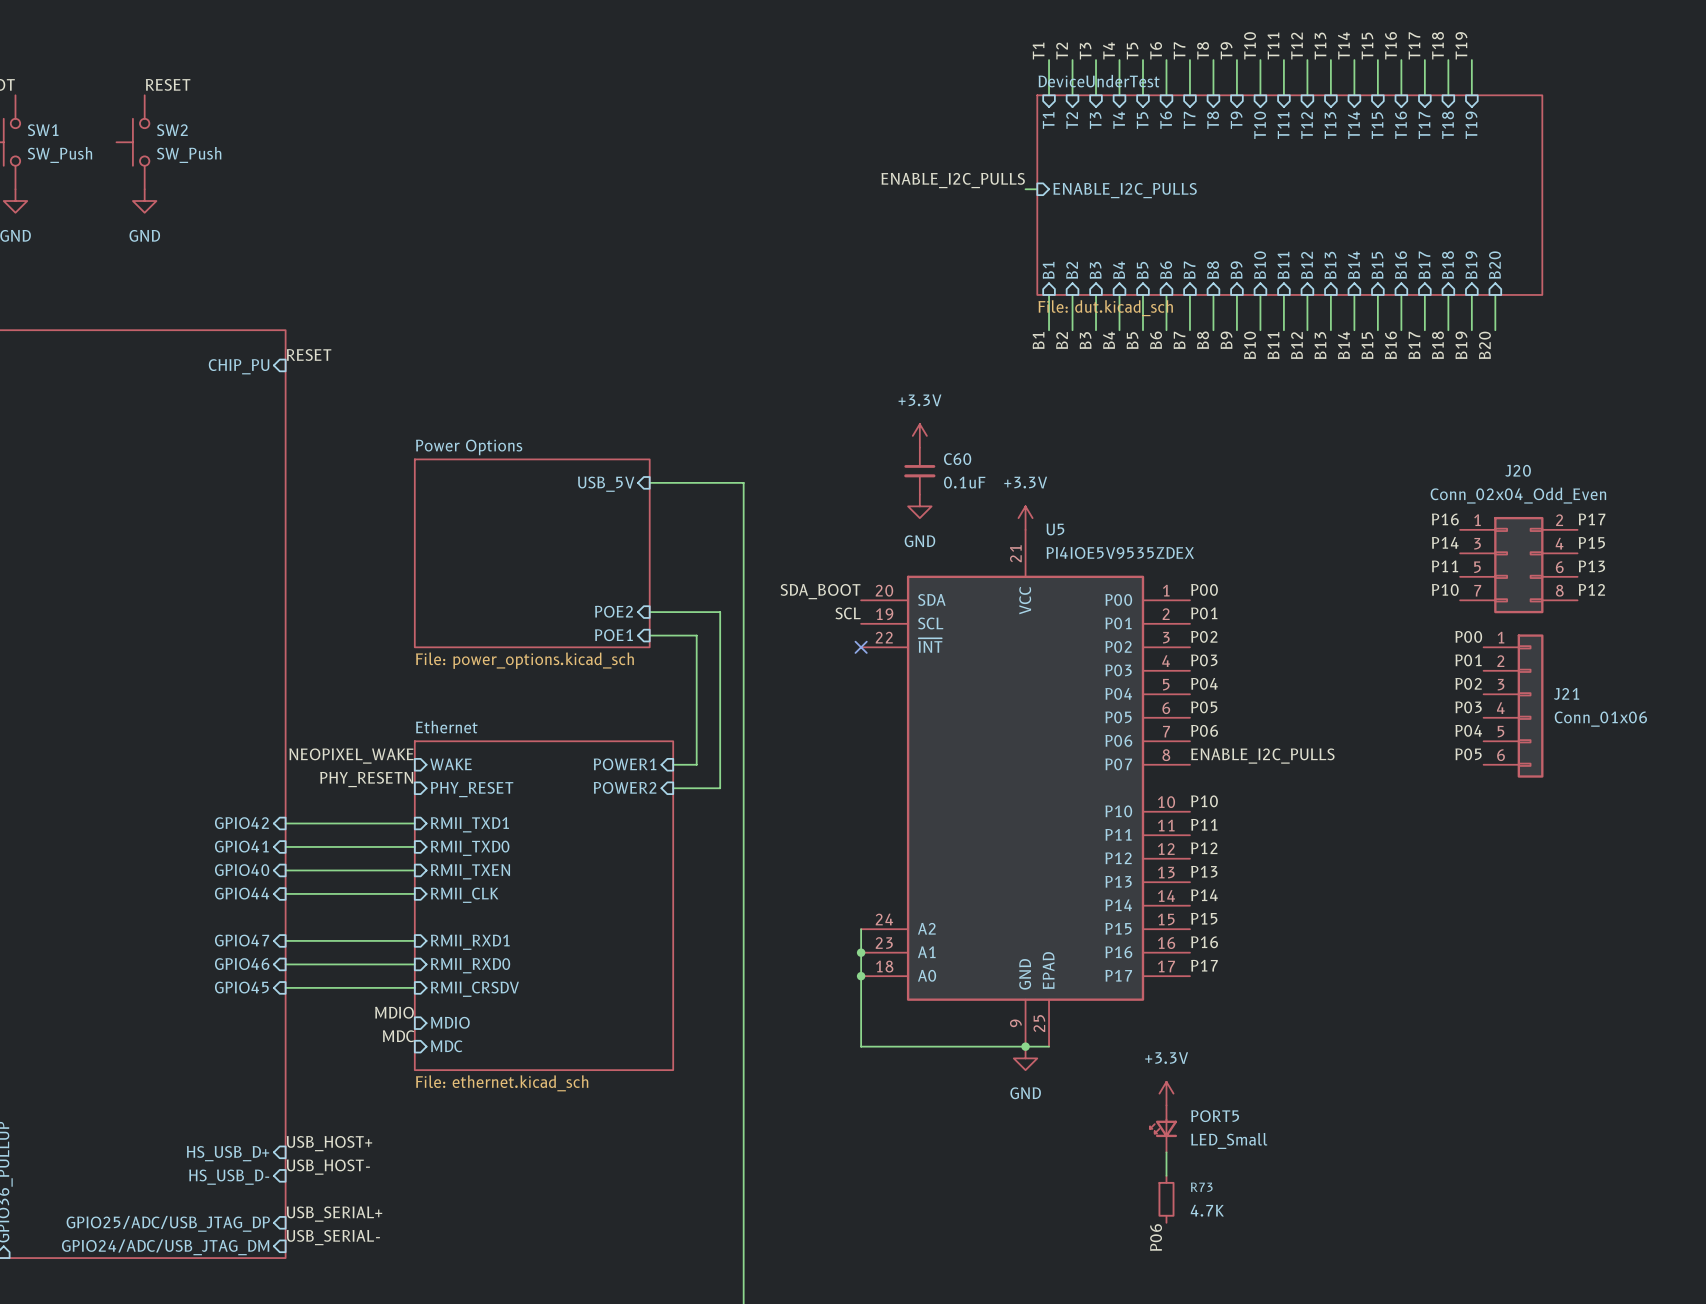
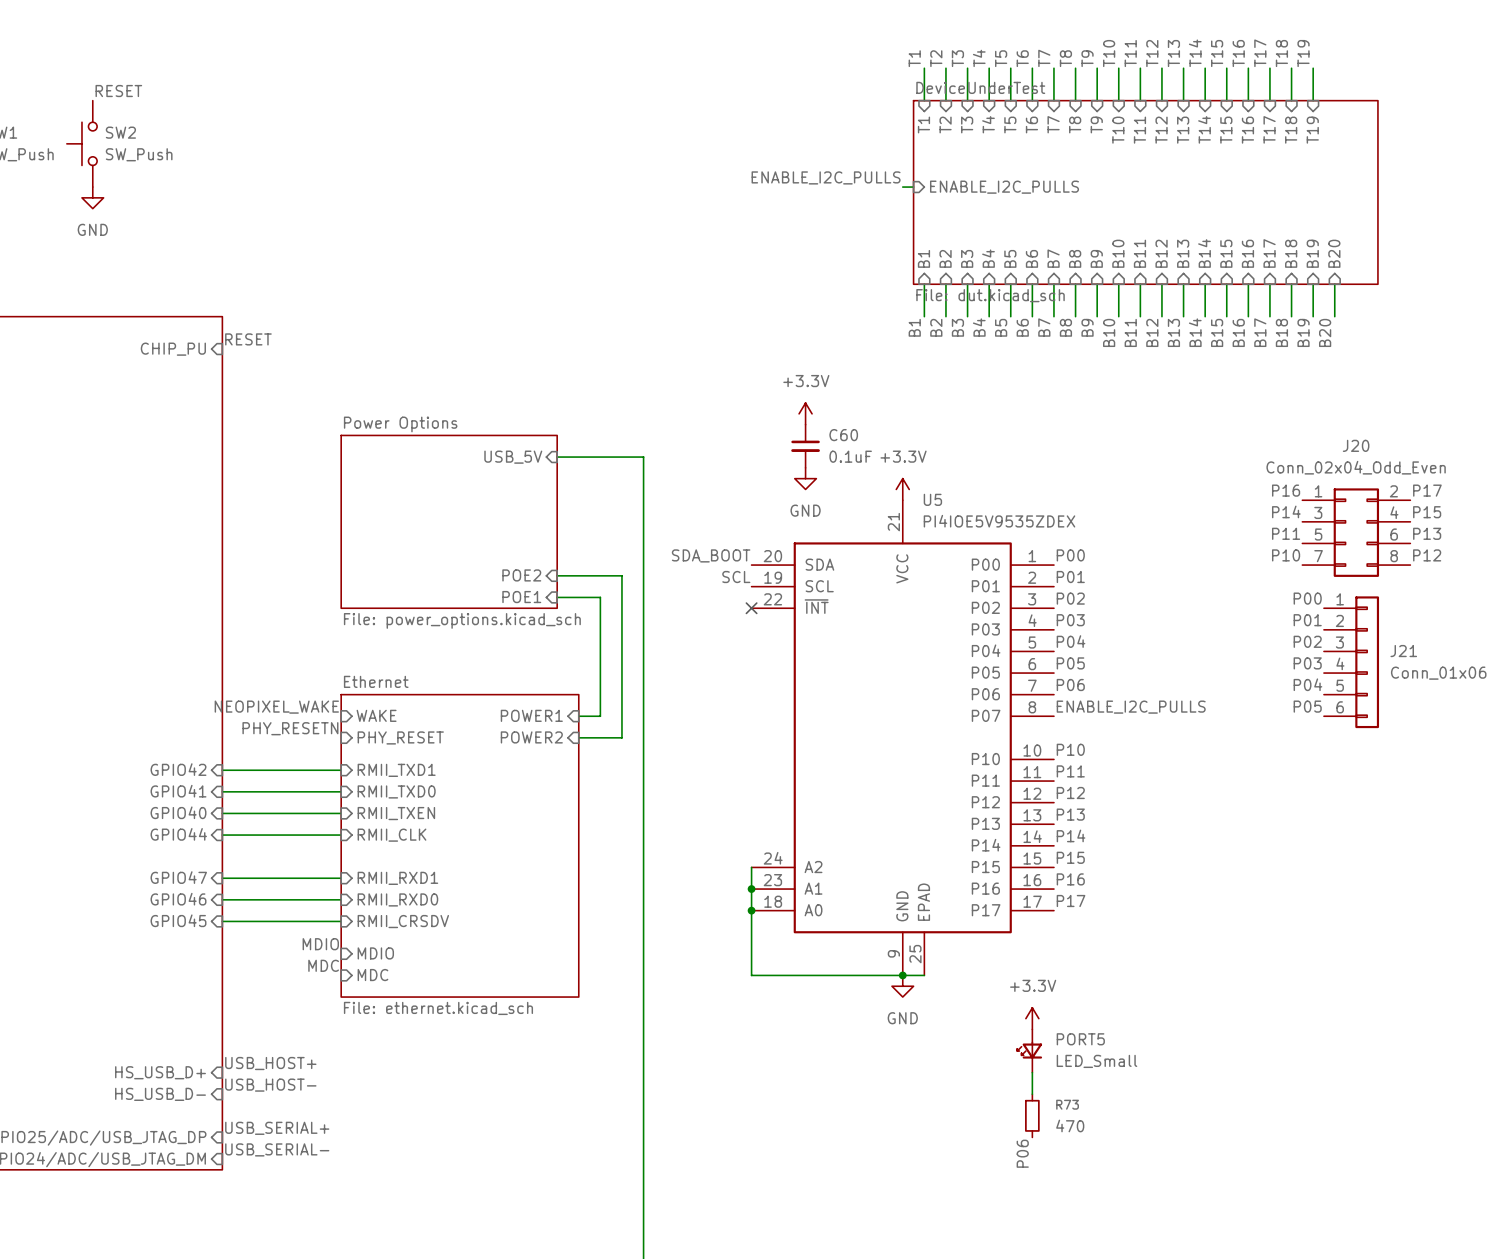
R73 value: 4.7K (1207, 1210) -> 470 (1070, 1125)

